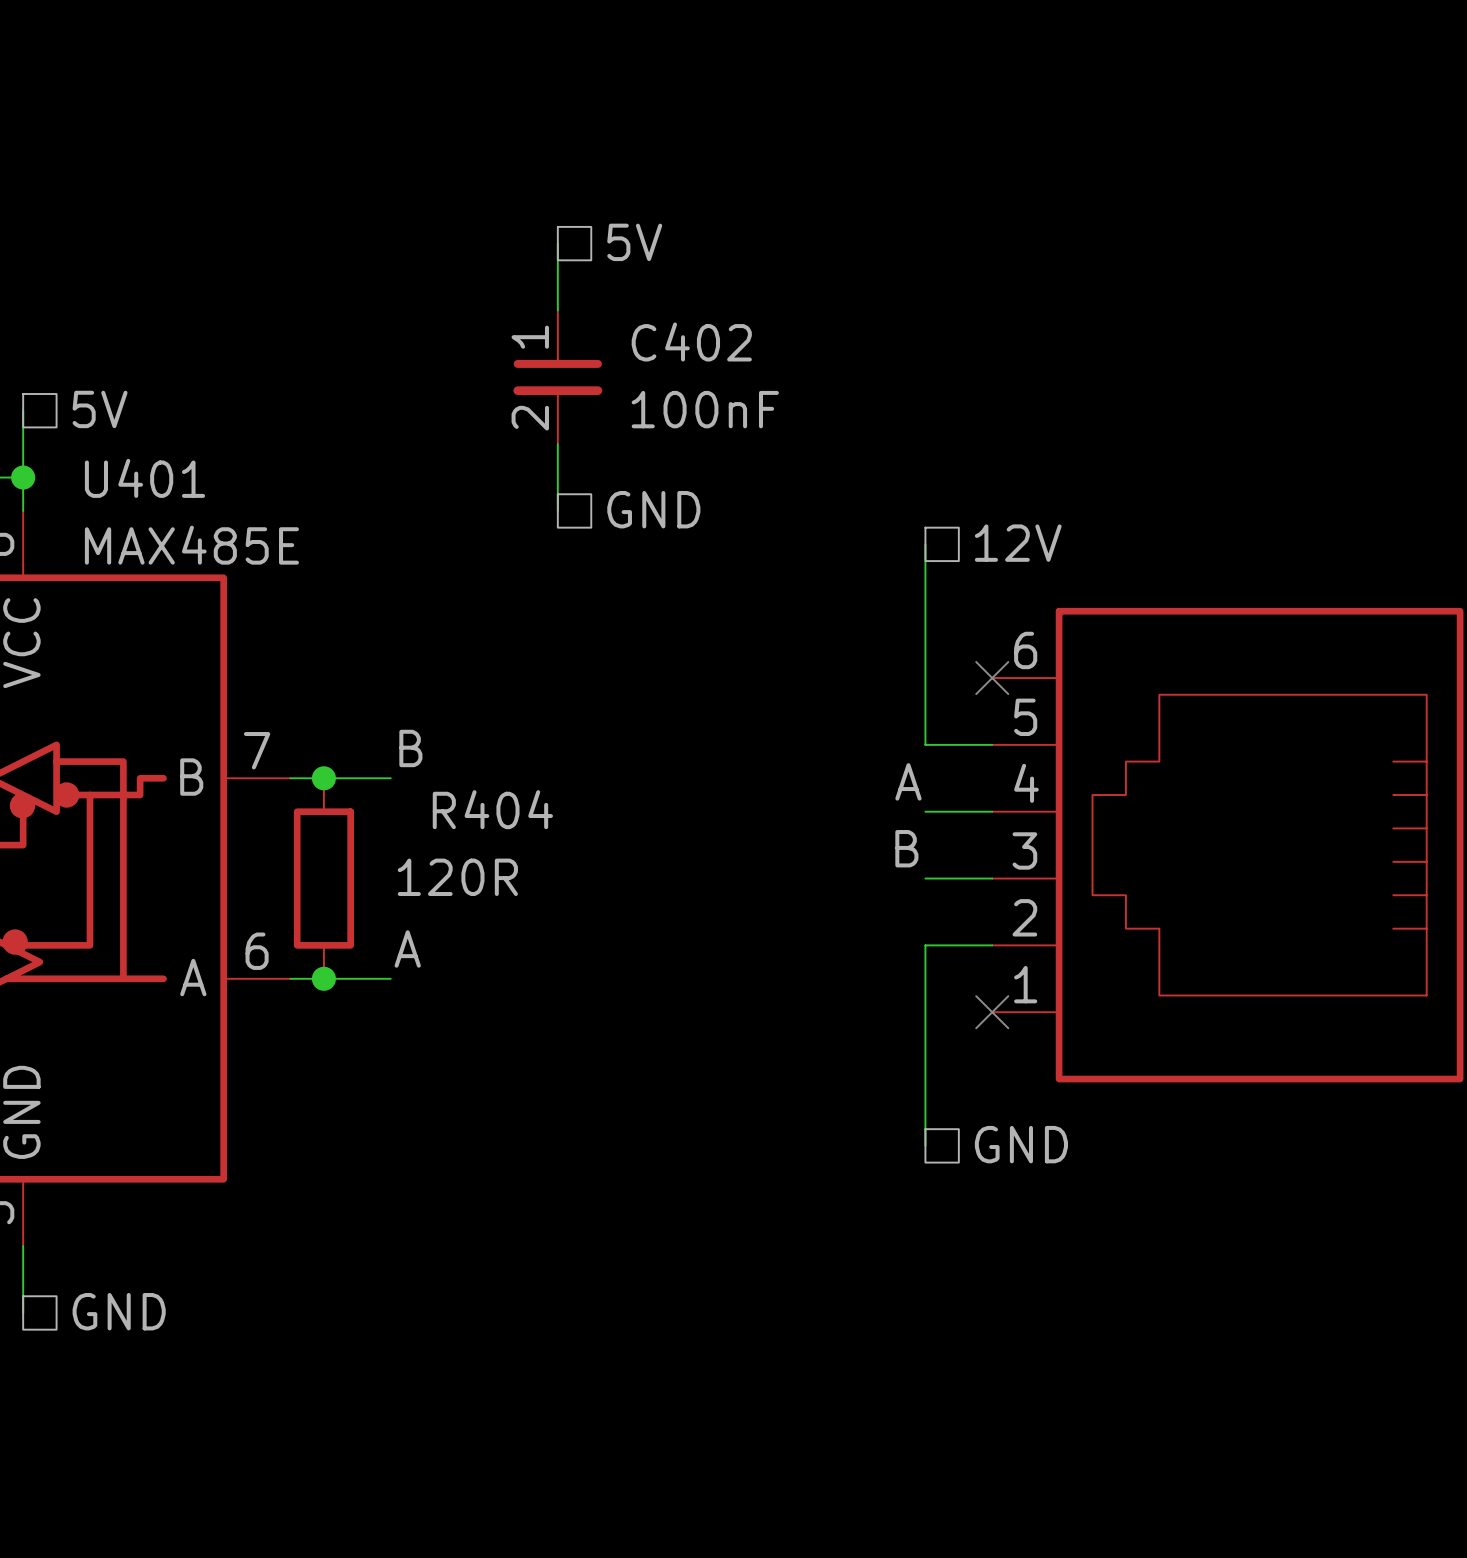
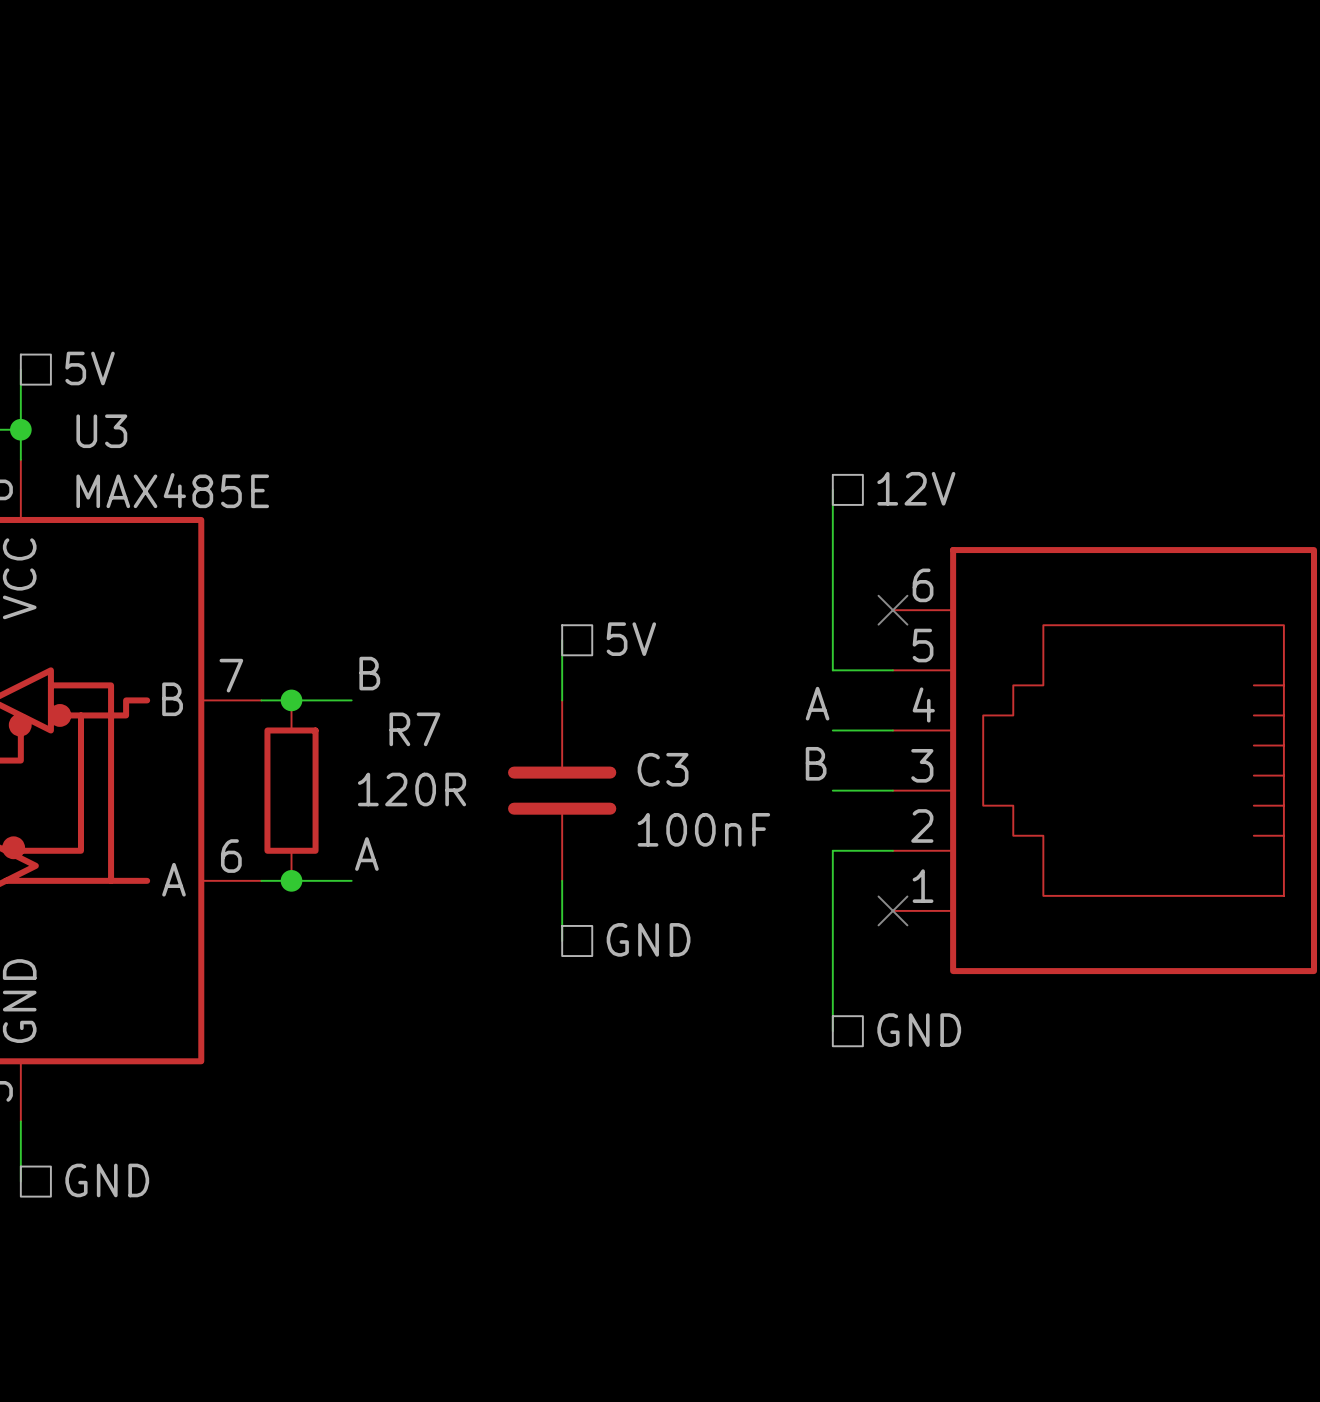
hierarchical label position: 5V (634, 242) -> 5V (631, 639)
wire: (557, 243) (557, 310) -> none
C402: 100nF (557, 377) -> none
wire: (557, 444) (557, 510) -> (562, 640) (562, 700)
U401 name: U401 (144, 478) -> U3 (101, 431)
hierarchical label position: GND (653, 509) -> GND (648, 939)
R404 name: R404 (492, 809) -> R7 (414, 729)
C3: none -> 100nF (562, 790)
wire: none -> (562, 880) (562, 941)

